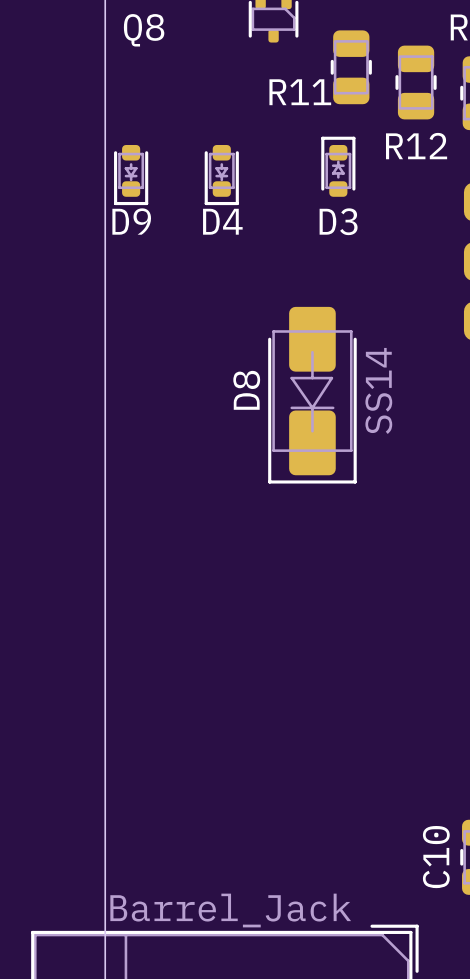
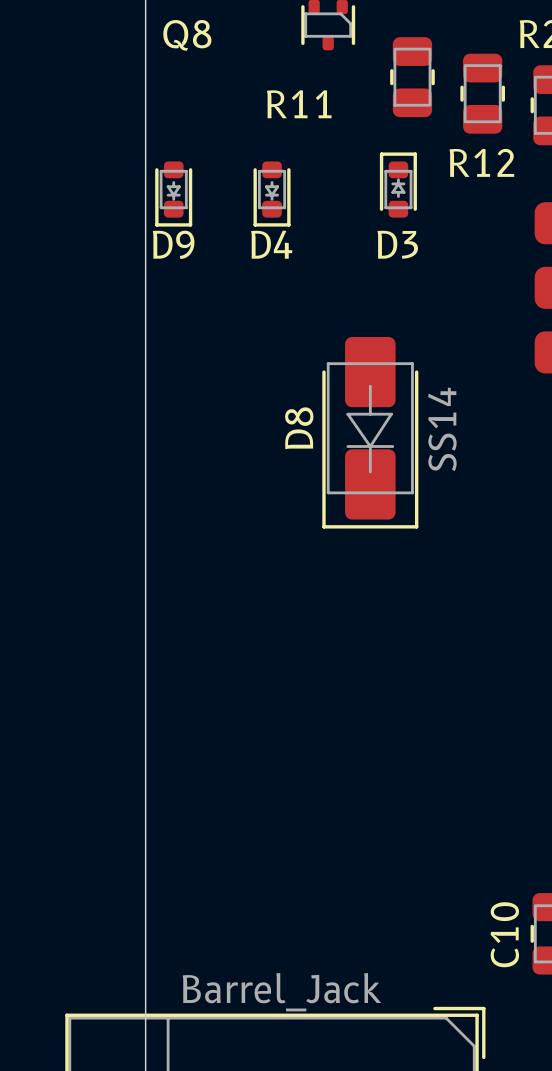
R11 name position: R11 (300, 92) -> R11 (299, 104)

